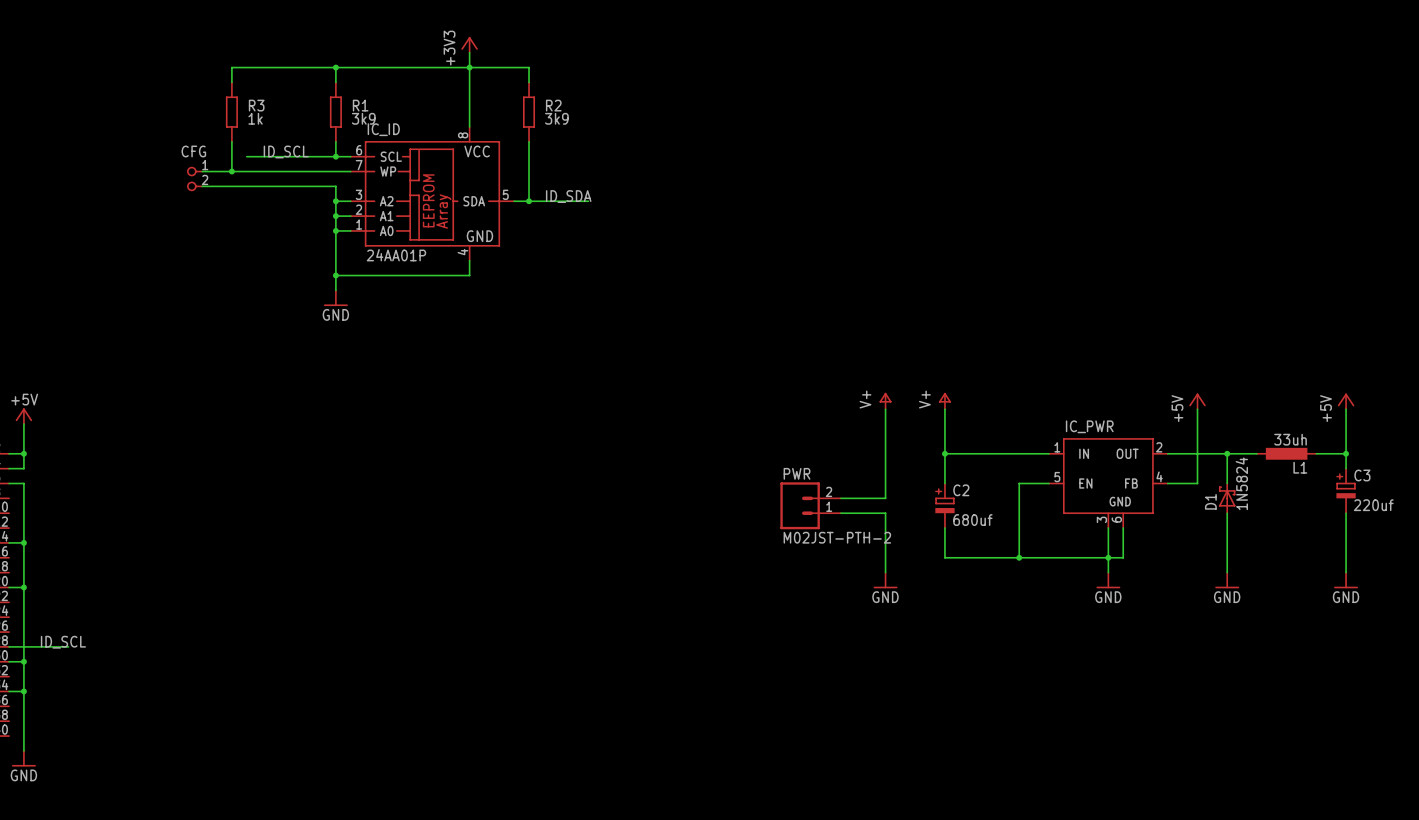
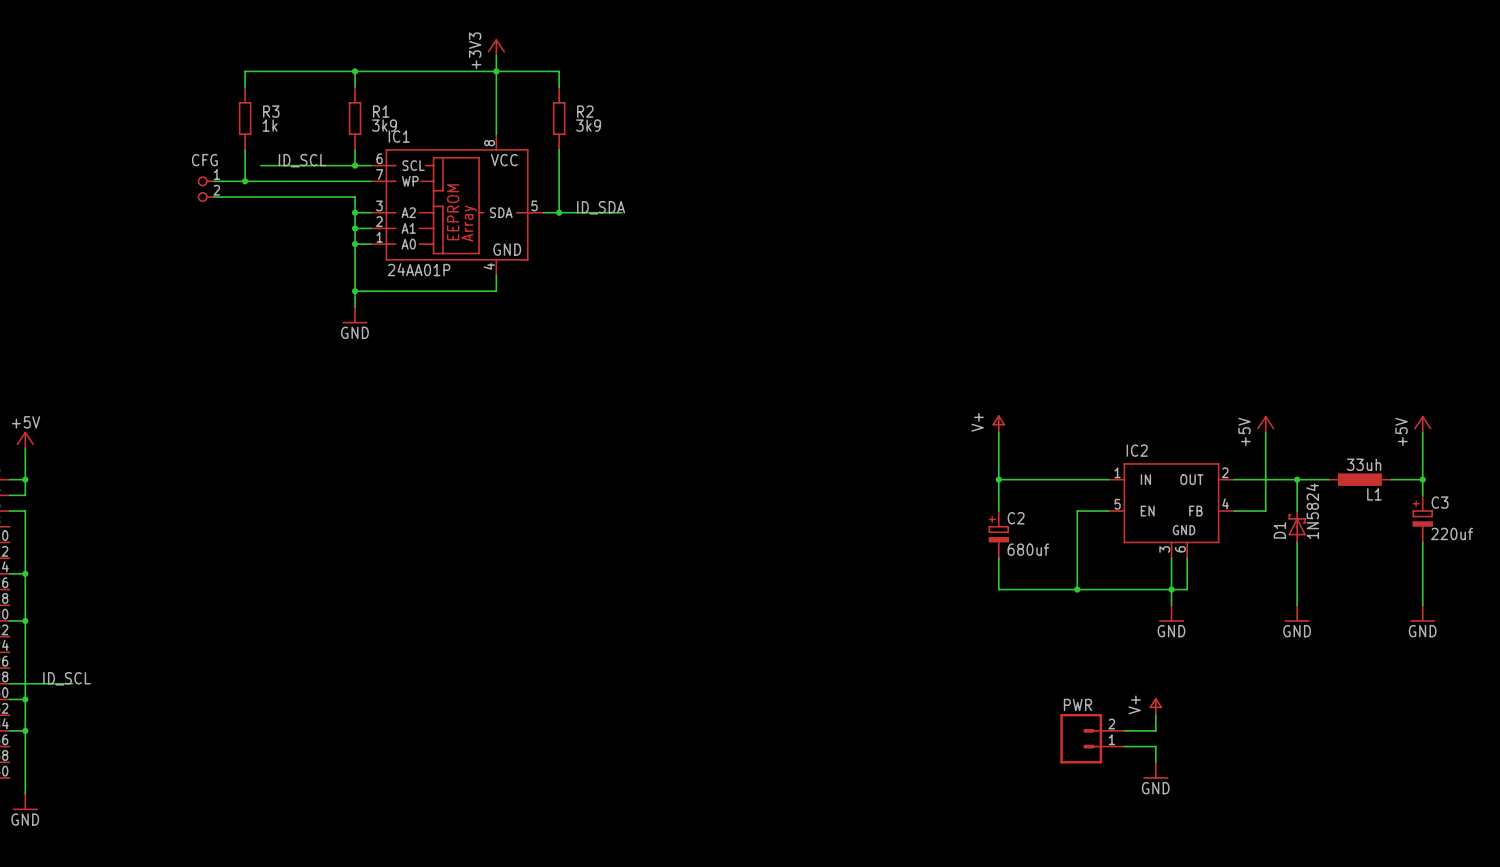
IC_ID name: IC_ID (383, 129) -> IC1 (399, 136)
power symbol: V+ (885, 401) -> none
wire: (885, 409) (885, 498) (840, 498) -> none
IC_PWR name: IC_PWR (1089, 426) -> IC2 (1137, 450)
PWR: M02JST-PTH-2 (810, 505) -> none
wire: (840, 513) (885, 513) (885, 572) -> none
power symbol: GND (885, 580) -> none
power symbol: none -> V+ (1155, 706)
wire: none -> (1155, 715) (1155, 730) (1124, 730)
PWR: none -> (1092, 738)
wire: none -> (1124, 746) (1155, 746) (1155, 762)
power symbol: none -> GND (1155, 770)

